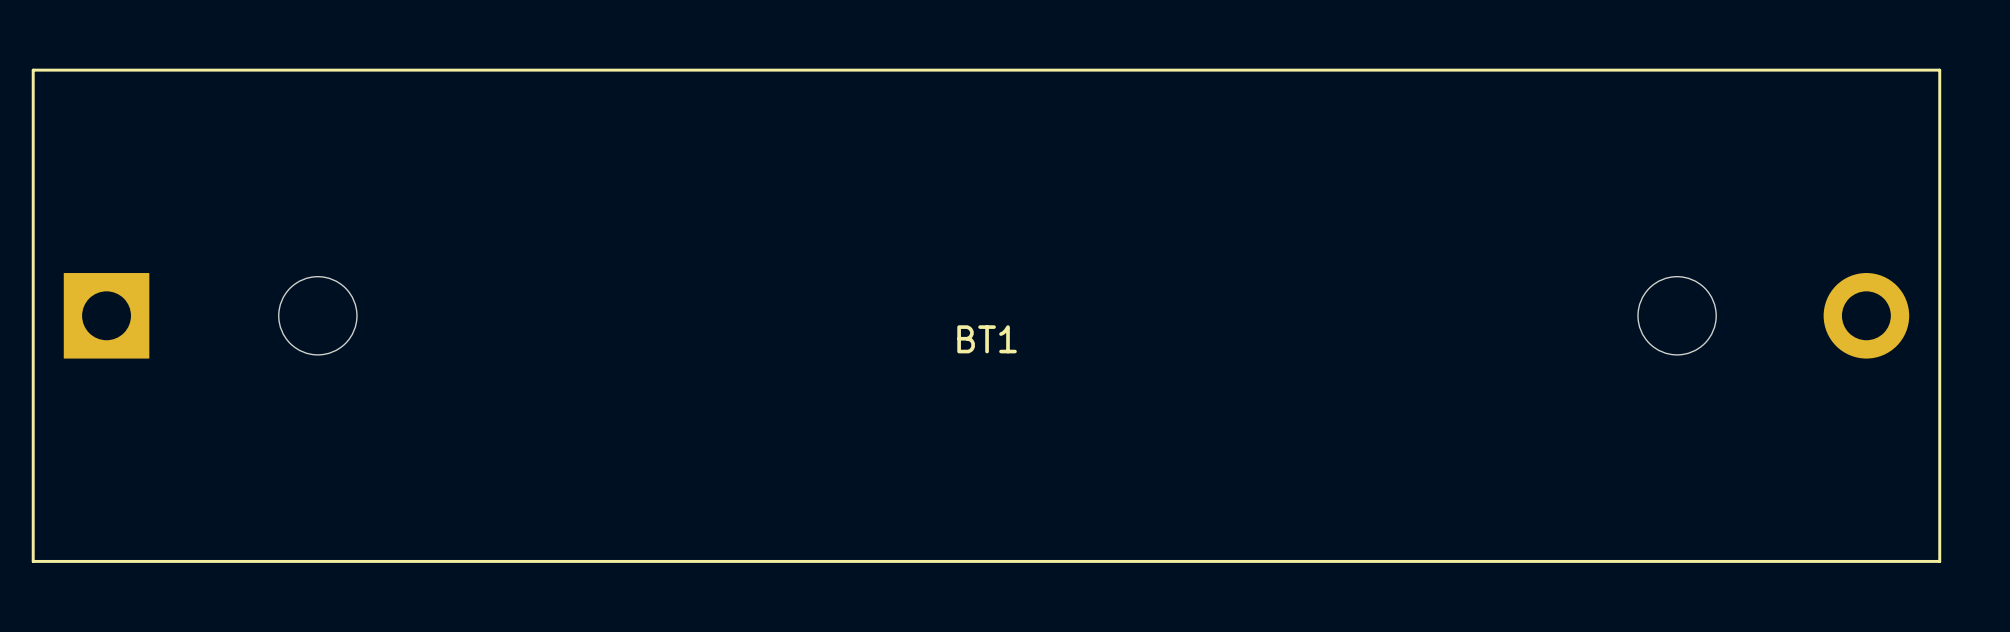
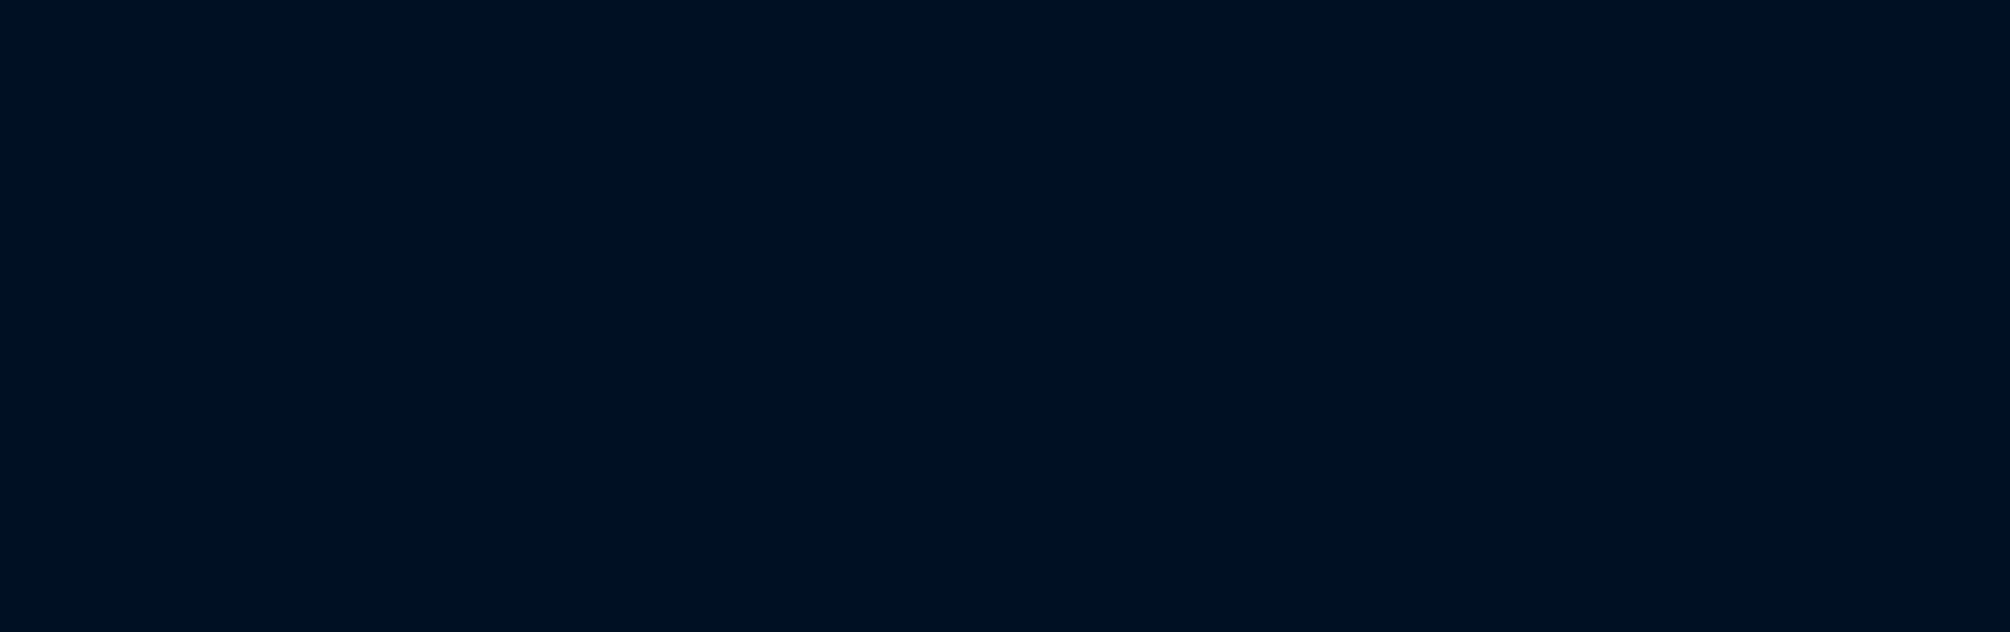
BT1: (986, 315) -> none

